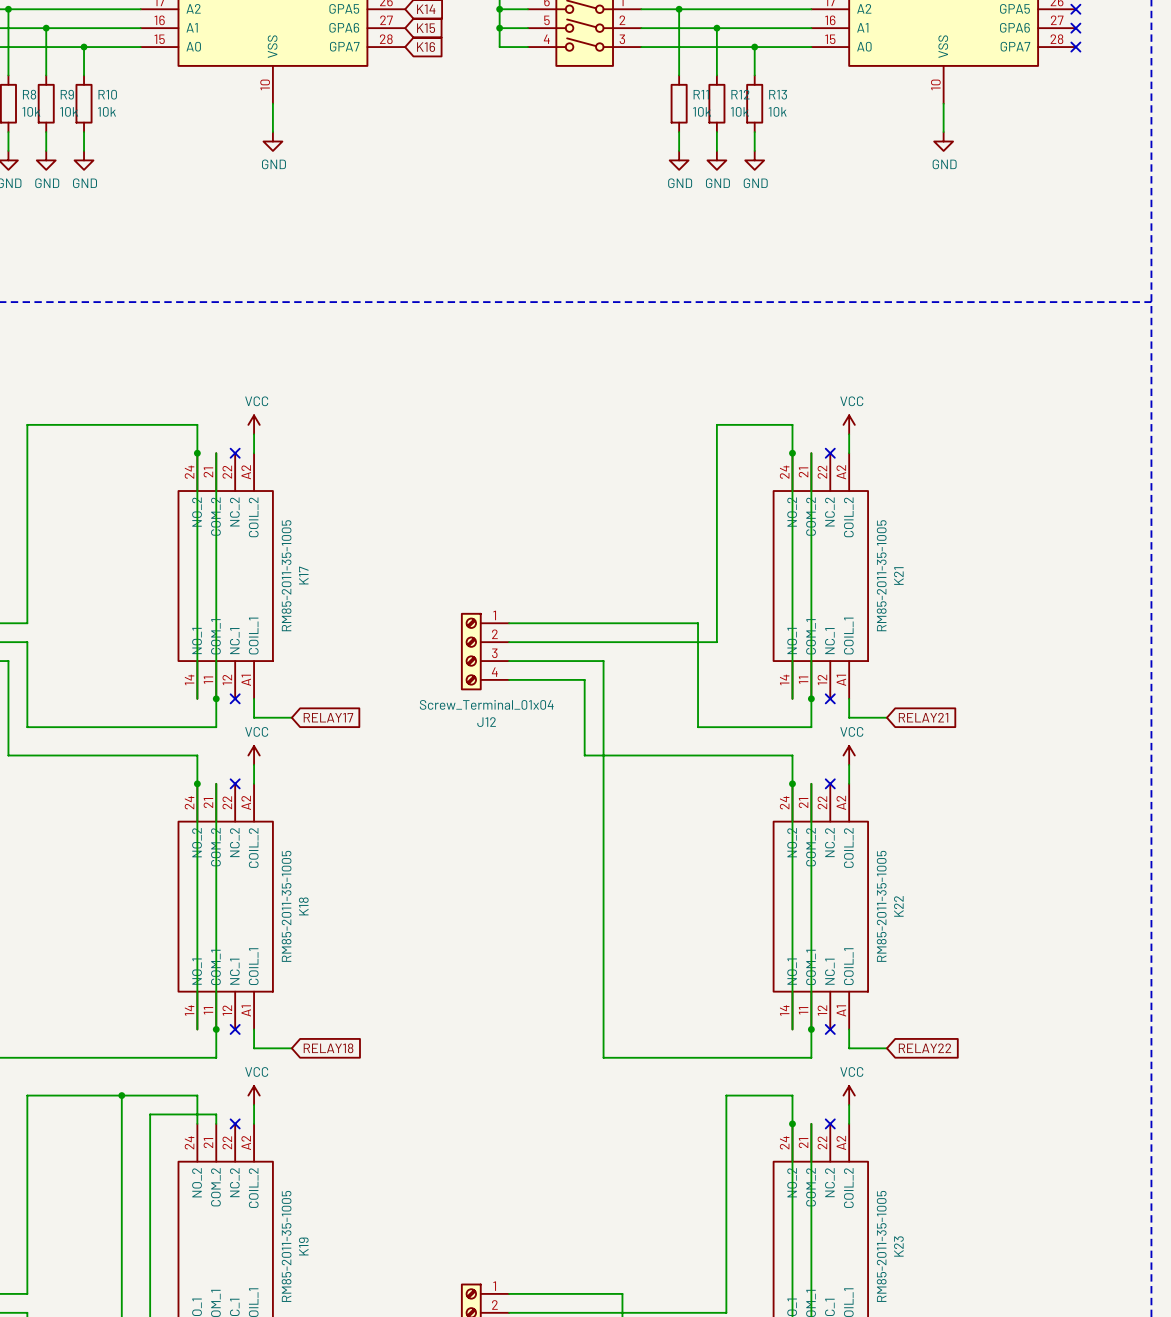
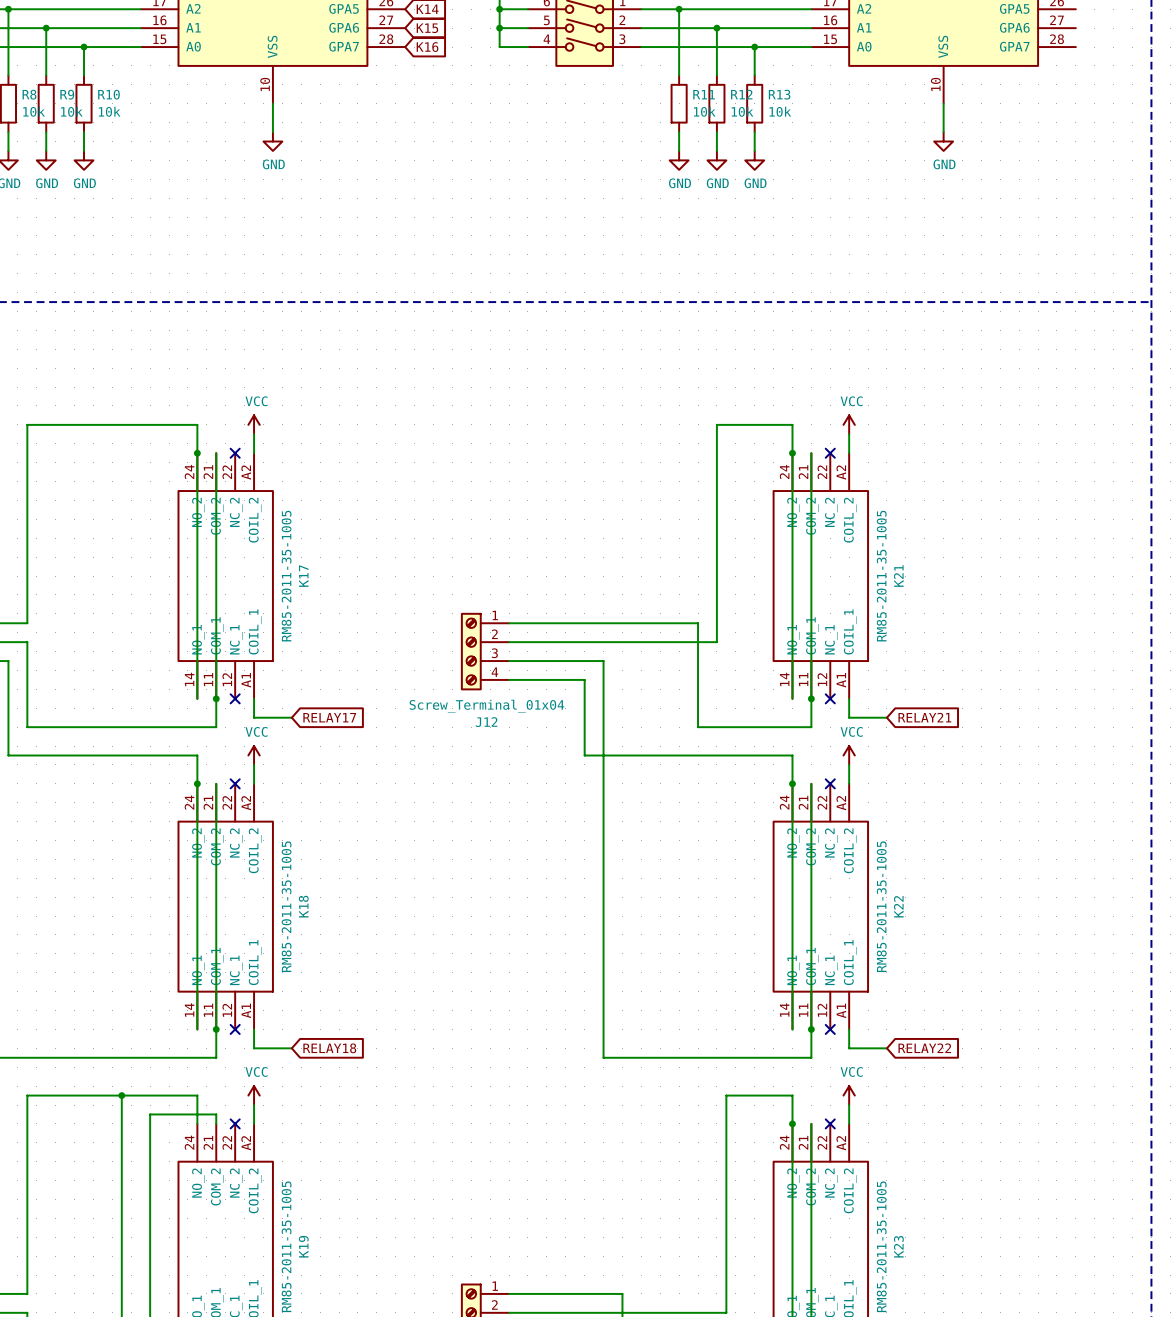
no-connect mark: (1075, 9) -> none
no-connect mark: (1075, 28) -> none
no-connect mark: (1075, 47) -> none

